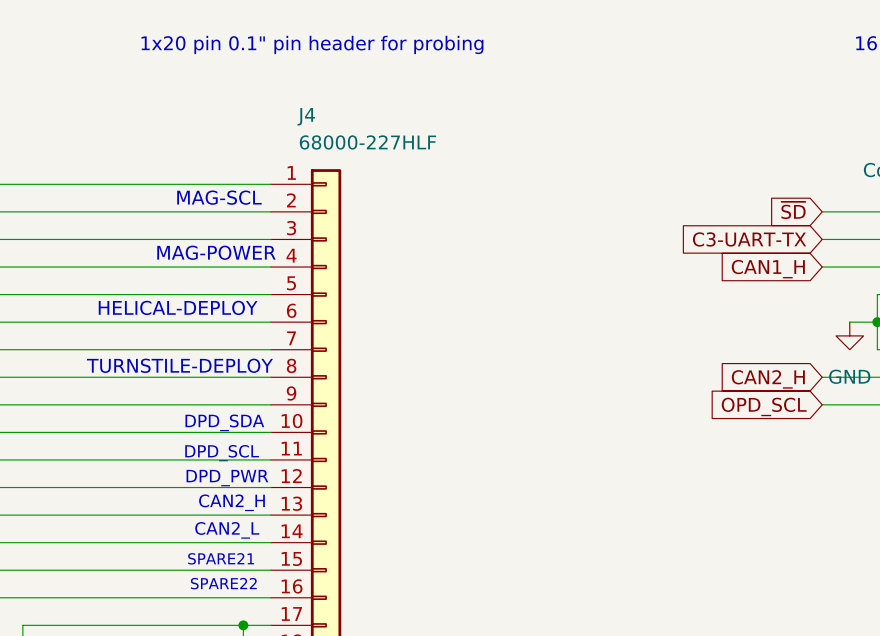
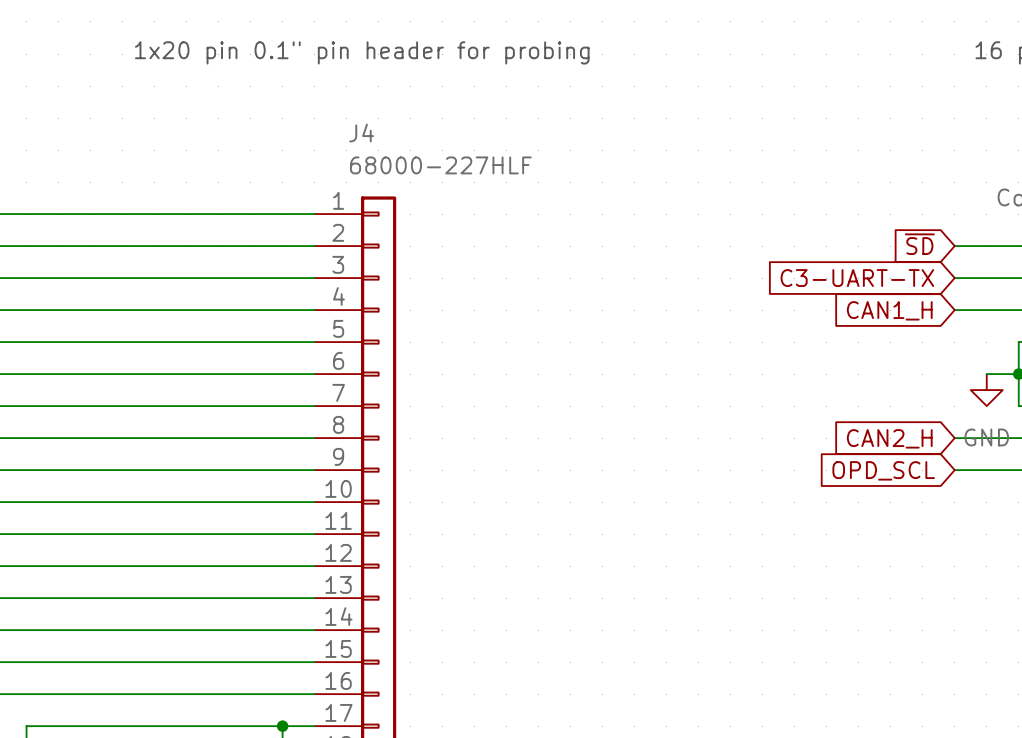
text: MAG-SCL (219, 197) -> none
text: MAG-POWER (216, 252) -> none
text: HELICAL-DEPLOY (178, 307) -> none
text: TURNSTILE-DEPLOY (179, 365) -> none
text: DPD_SDA (224, 422) -> none
text: DPD_SCL (222, 453) -> none
text: DPD_PWR (227, 478) -> none
text: CAN2_H (231, 502) -> none
text: CAN2_L (227, 530) -> none
text: SPARE21 (221, 558) -> none
text: SPARE22 (223, 583) -> none

